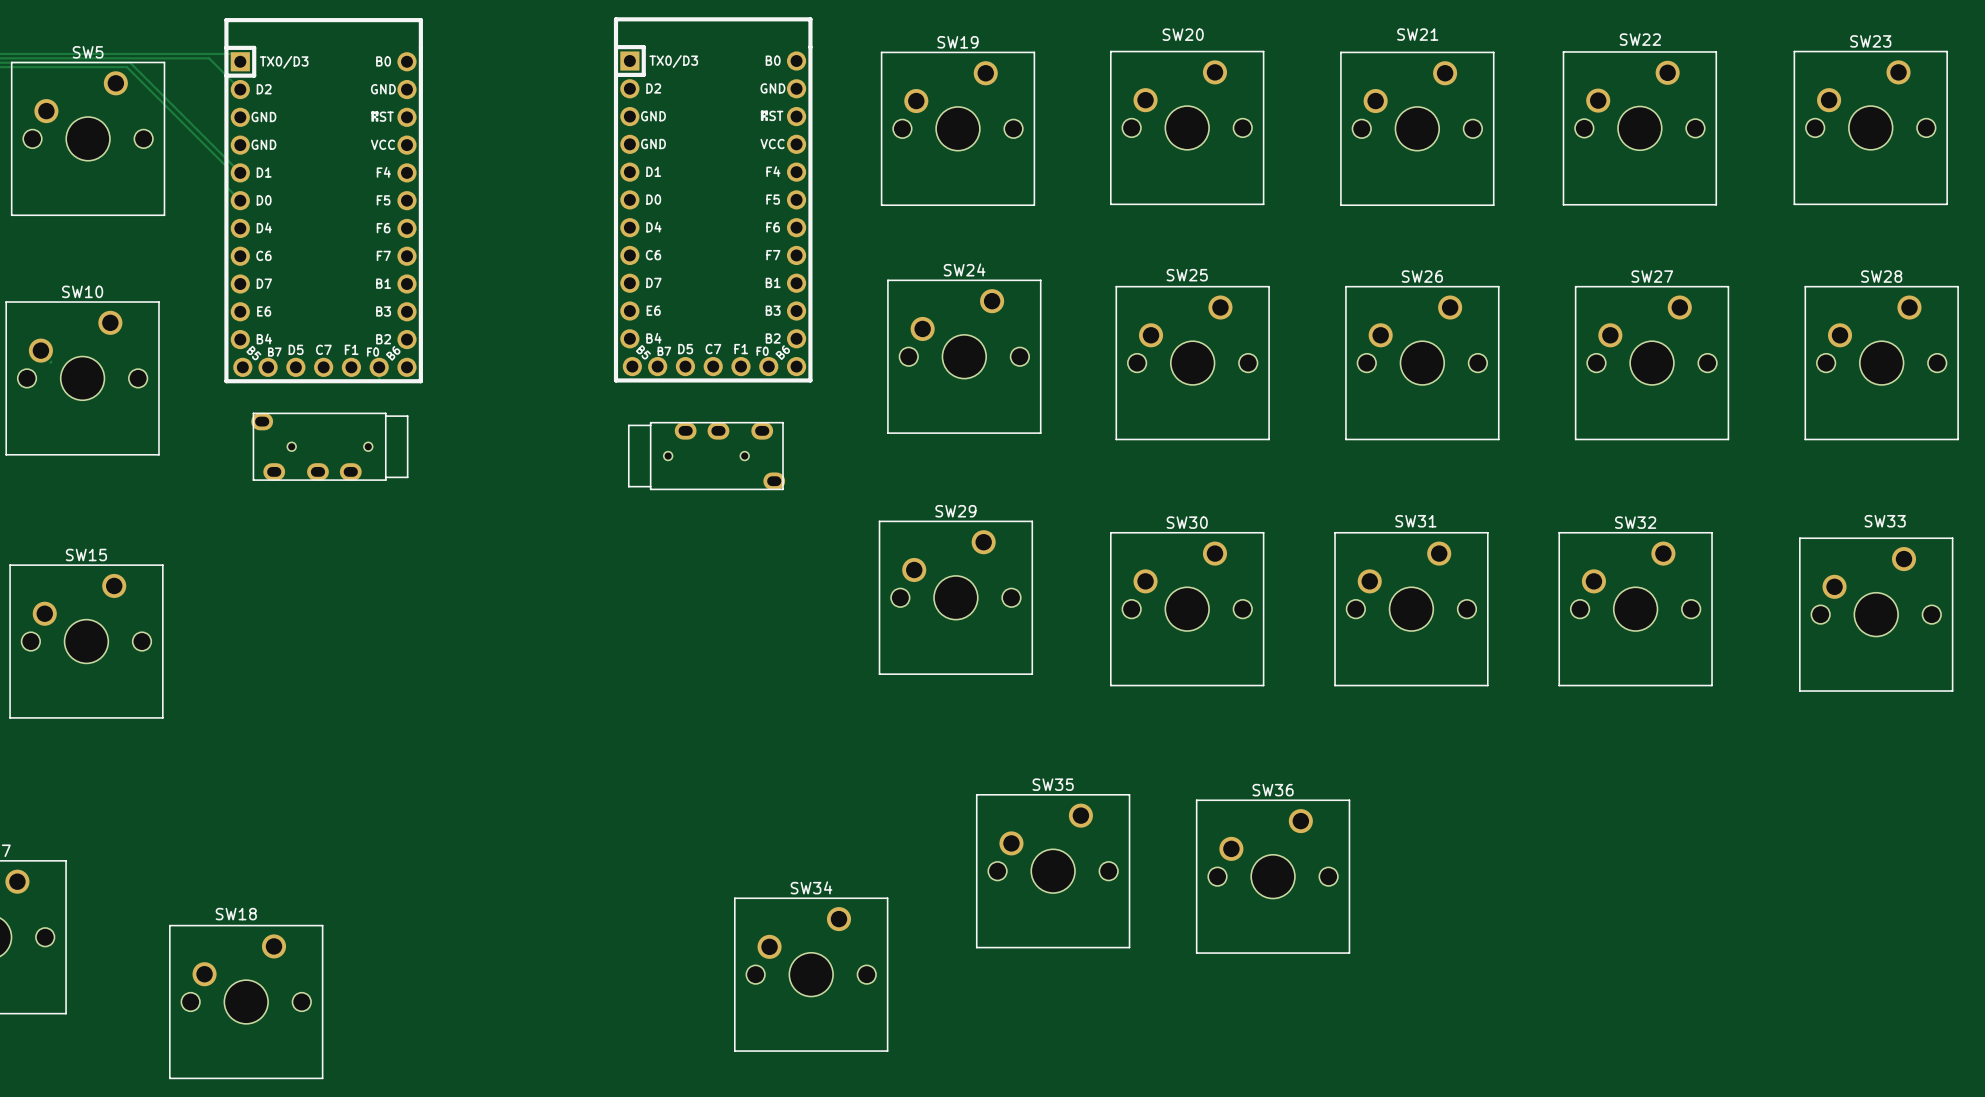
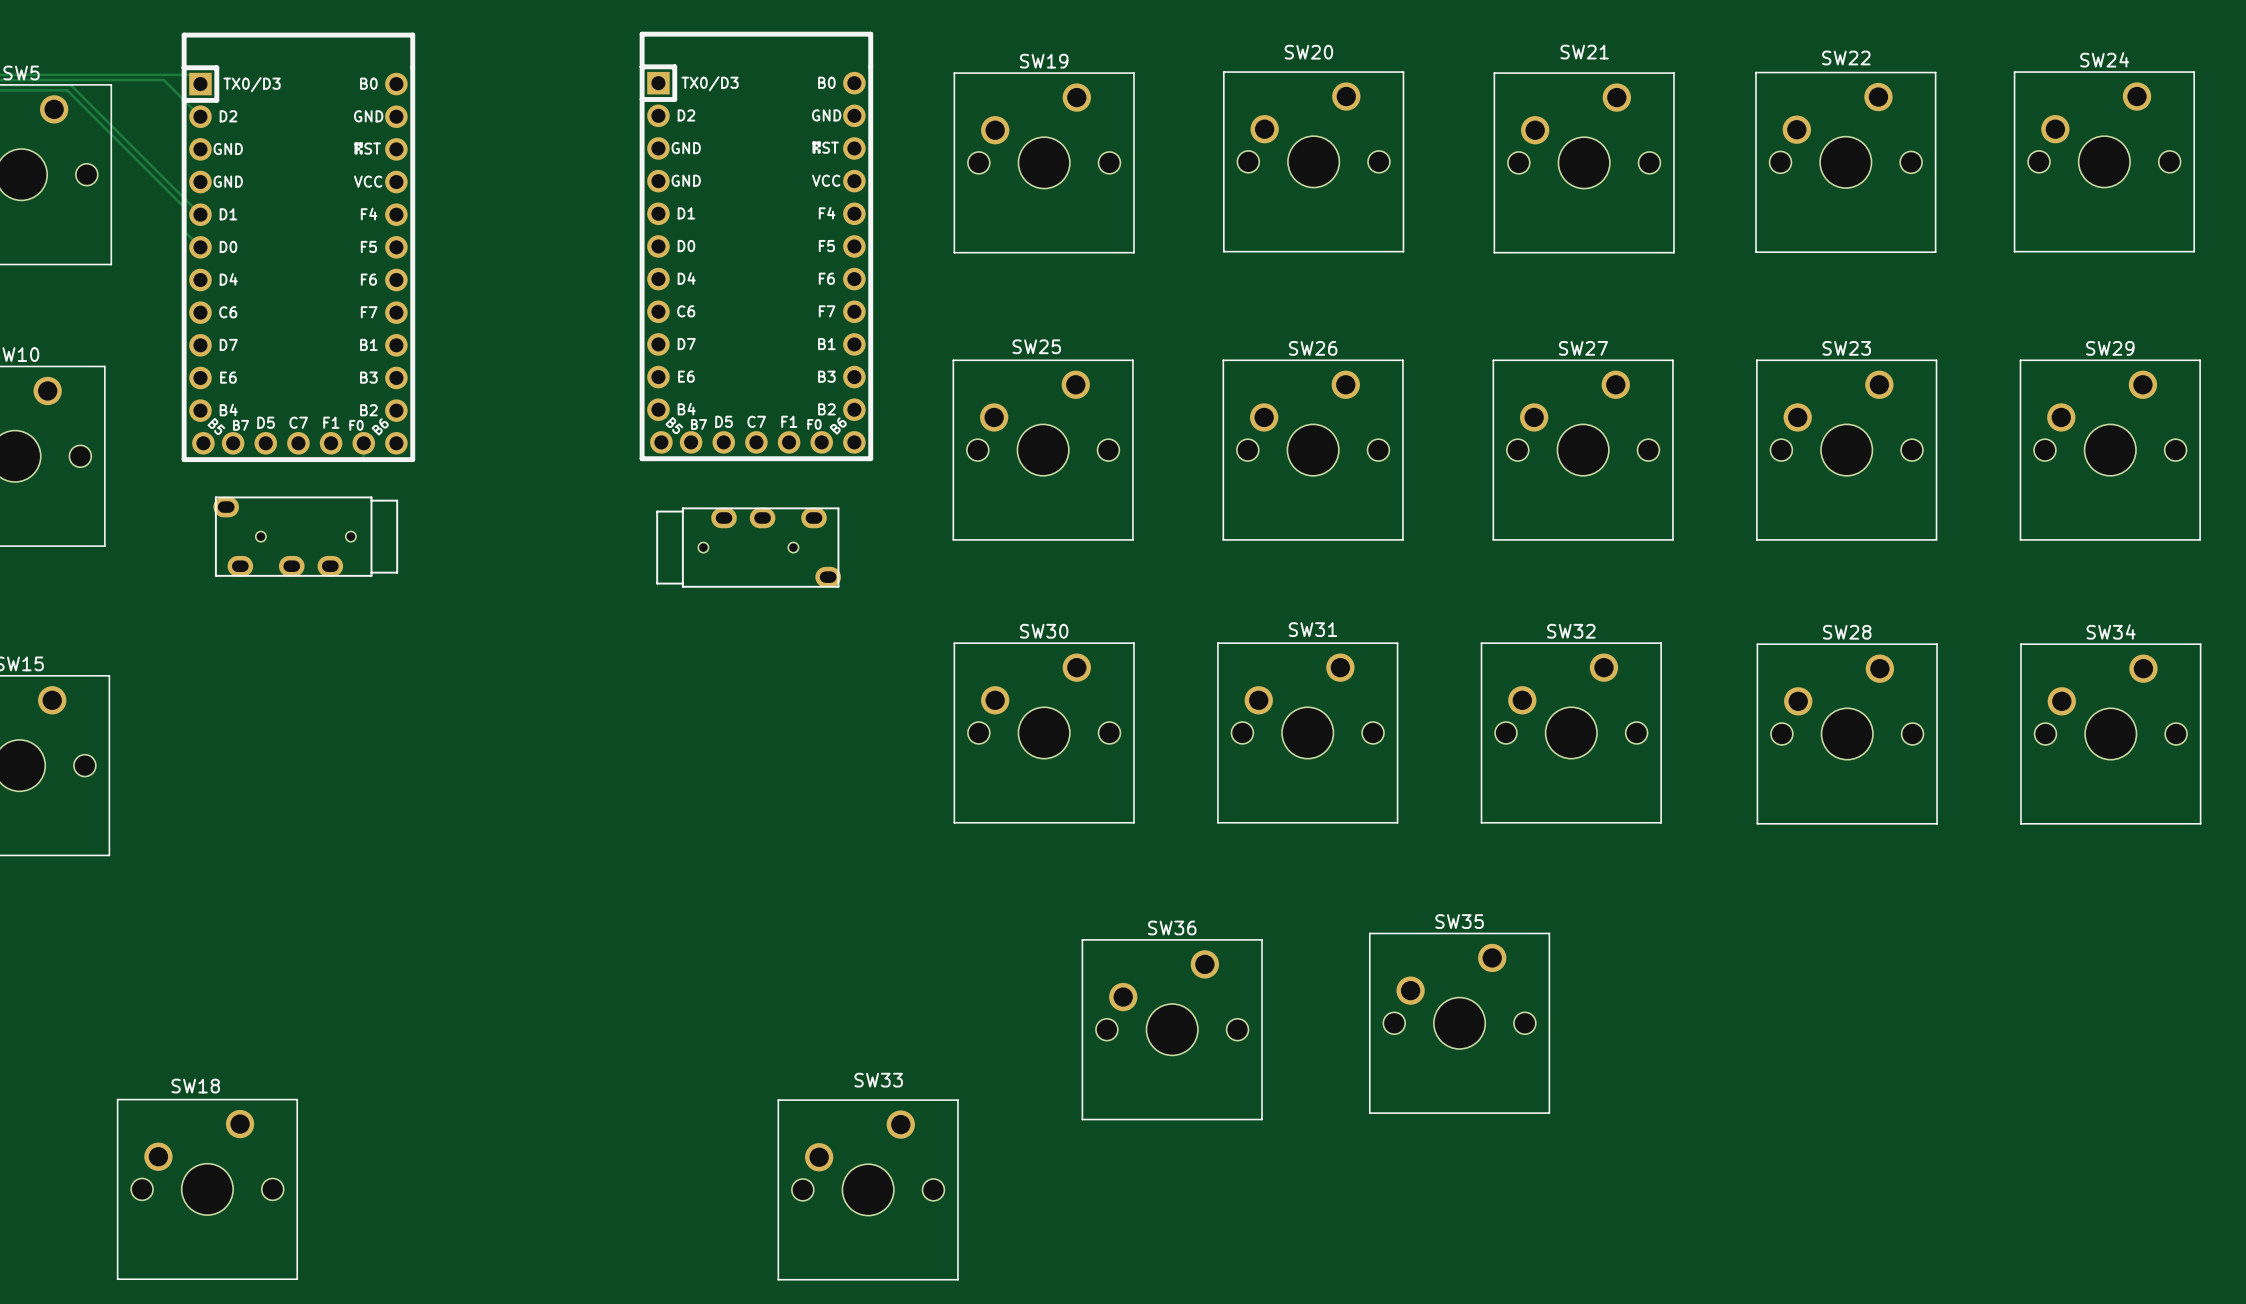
SW23 position: (1870, 127) -> (1846, 450)
SW24 position: (964, 356) -> (2104, 161)
SW25 position: (1192, 363) -> (1043, 450)
SW26 position: (1422, 363) -> (1313, 450)
SW27 position: (1652, 363) -> (1583, 450)
SW28 position: (1881, 363) -> (1847, 733)
SW29 position: (955, 597) -> (2110, 450)
SW30 position: (1187, 609) -> (1044, 732)
SW31 position: (1411, 609) -> (1307, 732)
SW32 position: (1635, 609) -> (1571, 732)
SW33 position: (1876, 614) -> (868, 1189)
SW35 position: (1053, 871) -> (1459, 1023)
SW36 position: (1273, 876) -> (1172, 1029)
SW34 position: (811, 974) -> (2110, 733)

